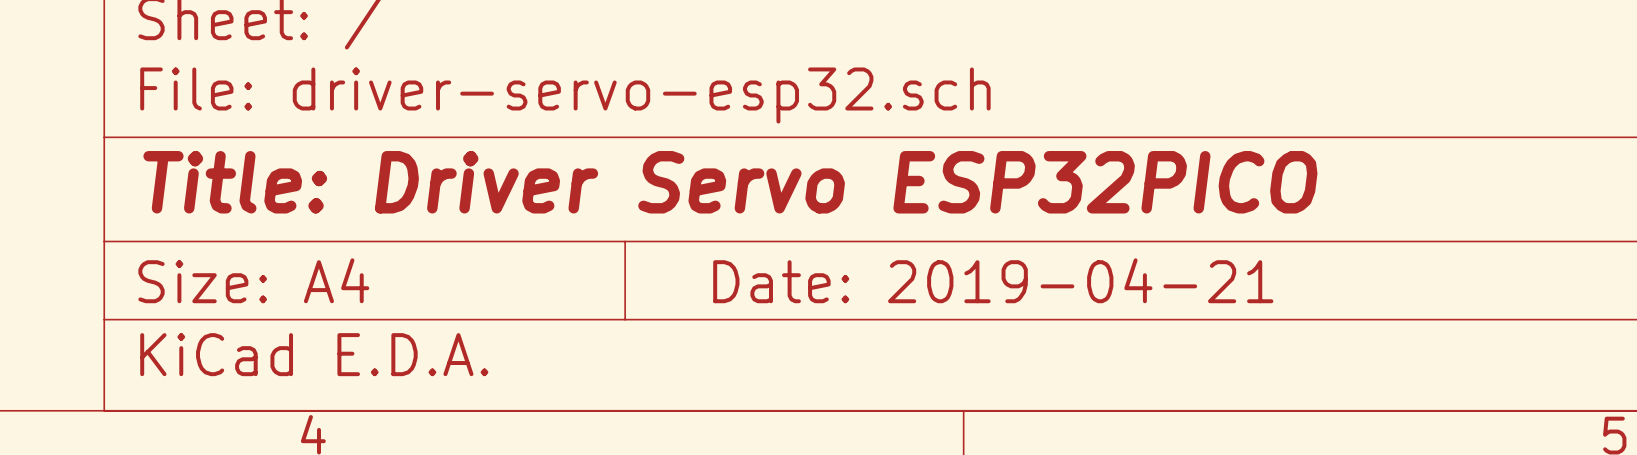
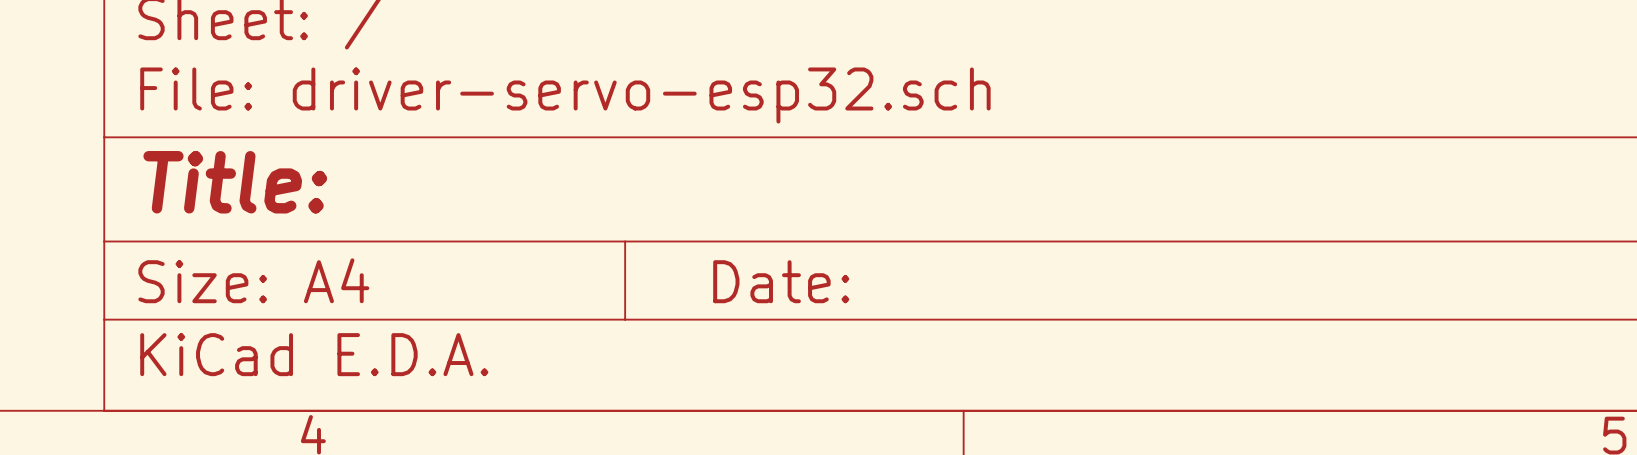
title block: Title: Driver Servo ESP32PICO (730, 182) -> Title: (235, 182)
title block: Date: 2019-04-21 (993, 280) -> Date: (781, 281)

